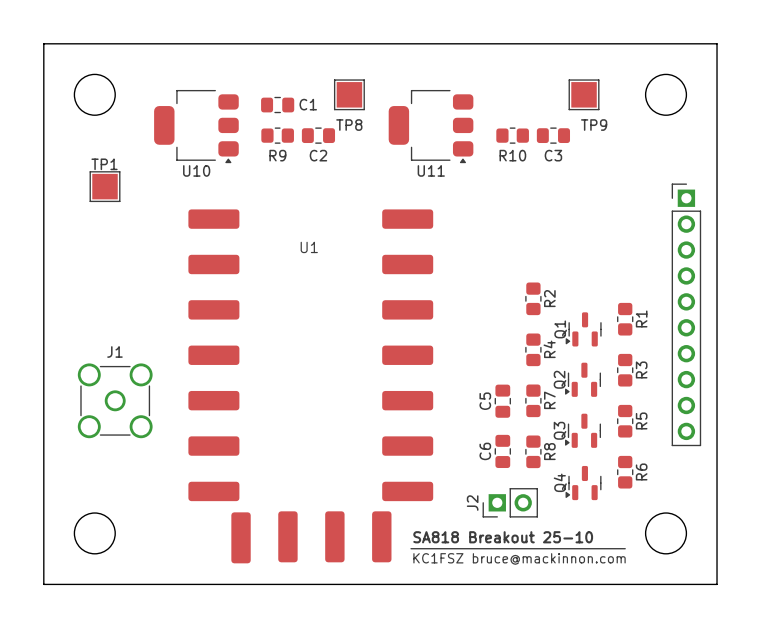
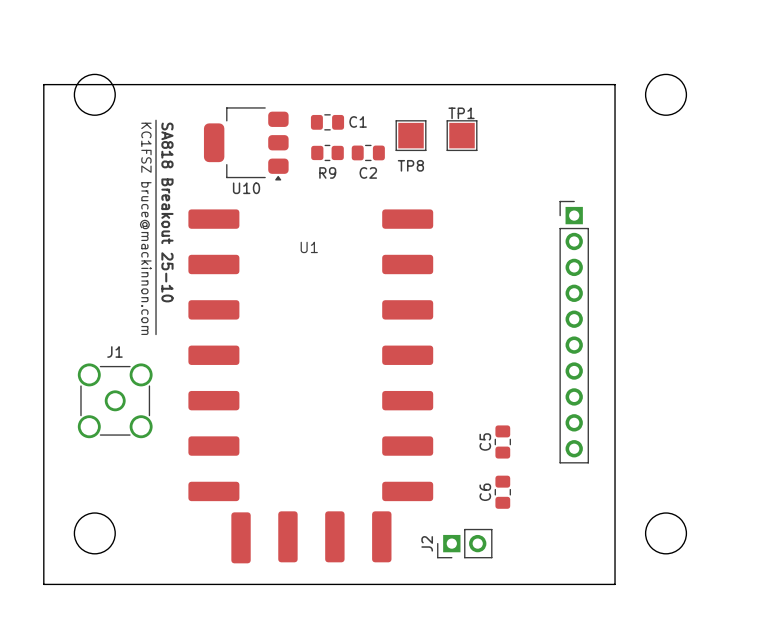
board edge: (43, 84) (43, 43) (717, 43) (717, 584) (615, 584) -> (43, 84) (615, 84) (615, 584)
TP8 position: (349, 94) -> (411, 135)
TP9: (584, 94) -> none
C1 position: (277, 105) -> (327, 122)
line: none -> (156, 120) (156, 334)
U10 position: (196, 126) -> (246, 143)
U11: (431, 126) -> none
R9 position: (277, 135) -> (327, 152)
C2 position: (318, 135) -> (368, 152)
R10: (512, 135) -> none
C3: (553, 135) -> none
TP1 position: (105, 186) -> (462, 135)
text: none -> SA818 Breakout 25-10 (167, 212)
text: none -> KC1FSZ bruce@mackinnon.com (145, 228)
R2: (533, 298) -> none
part position: (686, 314) -> (574, 332)
R1: (625, 319) -> none
Q1: (583, 329) -> none
R4: (533, 349) -> none
R3: (625, 370) -> none
Q2: (582, 379) -> none
R7: (533, 400) -> none
C5 position: (502, 401) -> (502, 441)
R5: (625, 421) -> none
Q3: (582, 430) -> none
C6 position: (502, 451) -> (502, 492)
R8: (533, 451) -> none
R6: (625, 472) -> none
Q4: (583, 483) -> none
J2 position: (510, 502) -> (464, 543)
text: SA818 Breakout 25-10 (503, 537) -> none
line: (411, 548) (625, 548) -> none
text: KC1FSZ bruce@mackinnon.com (519, 558) -> none

